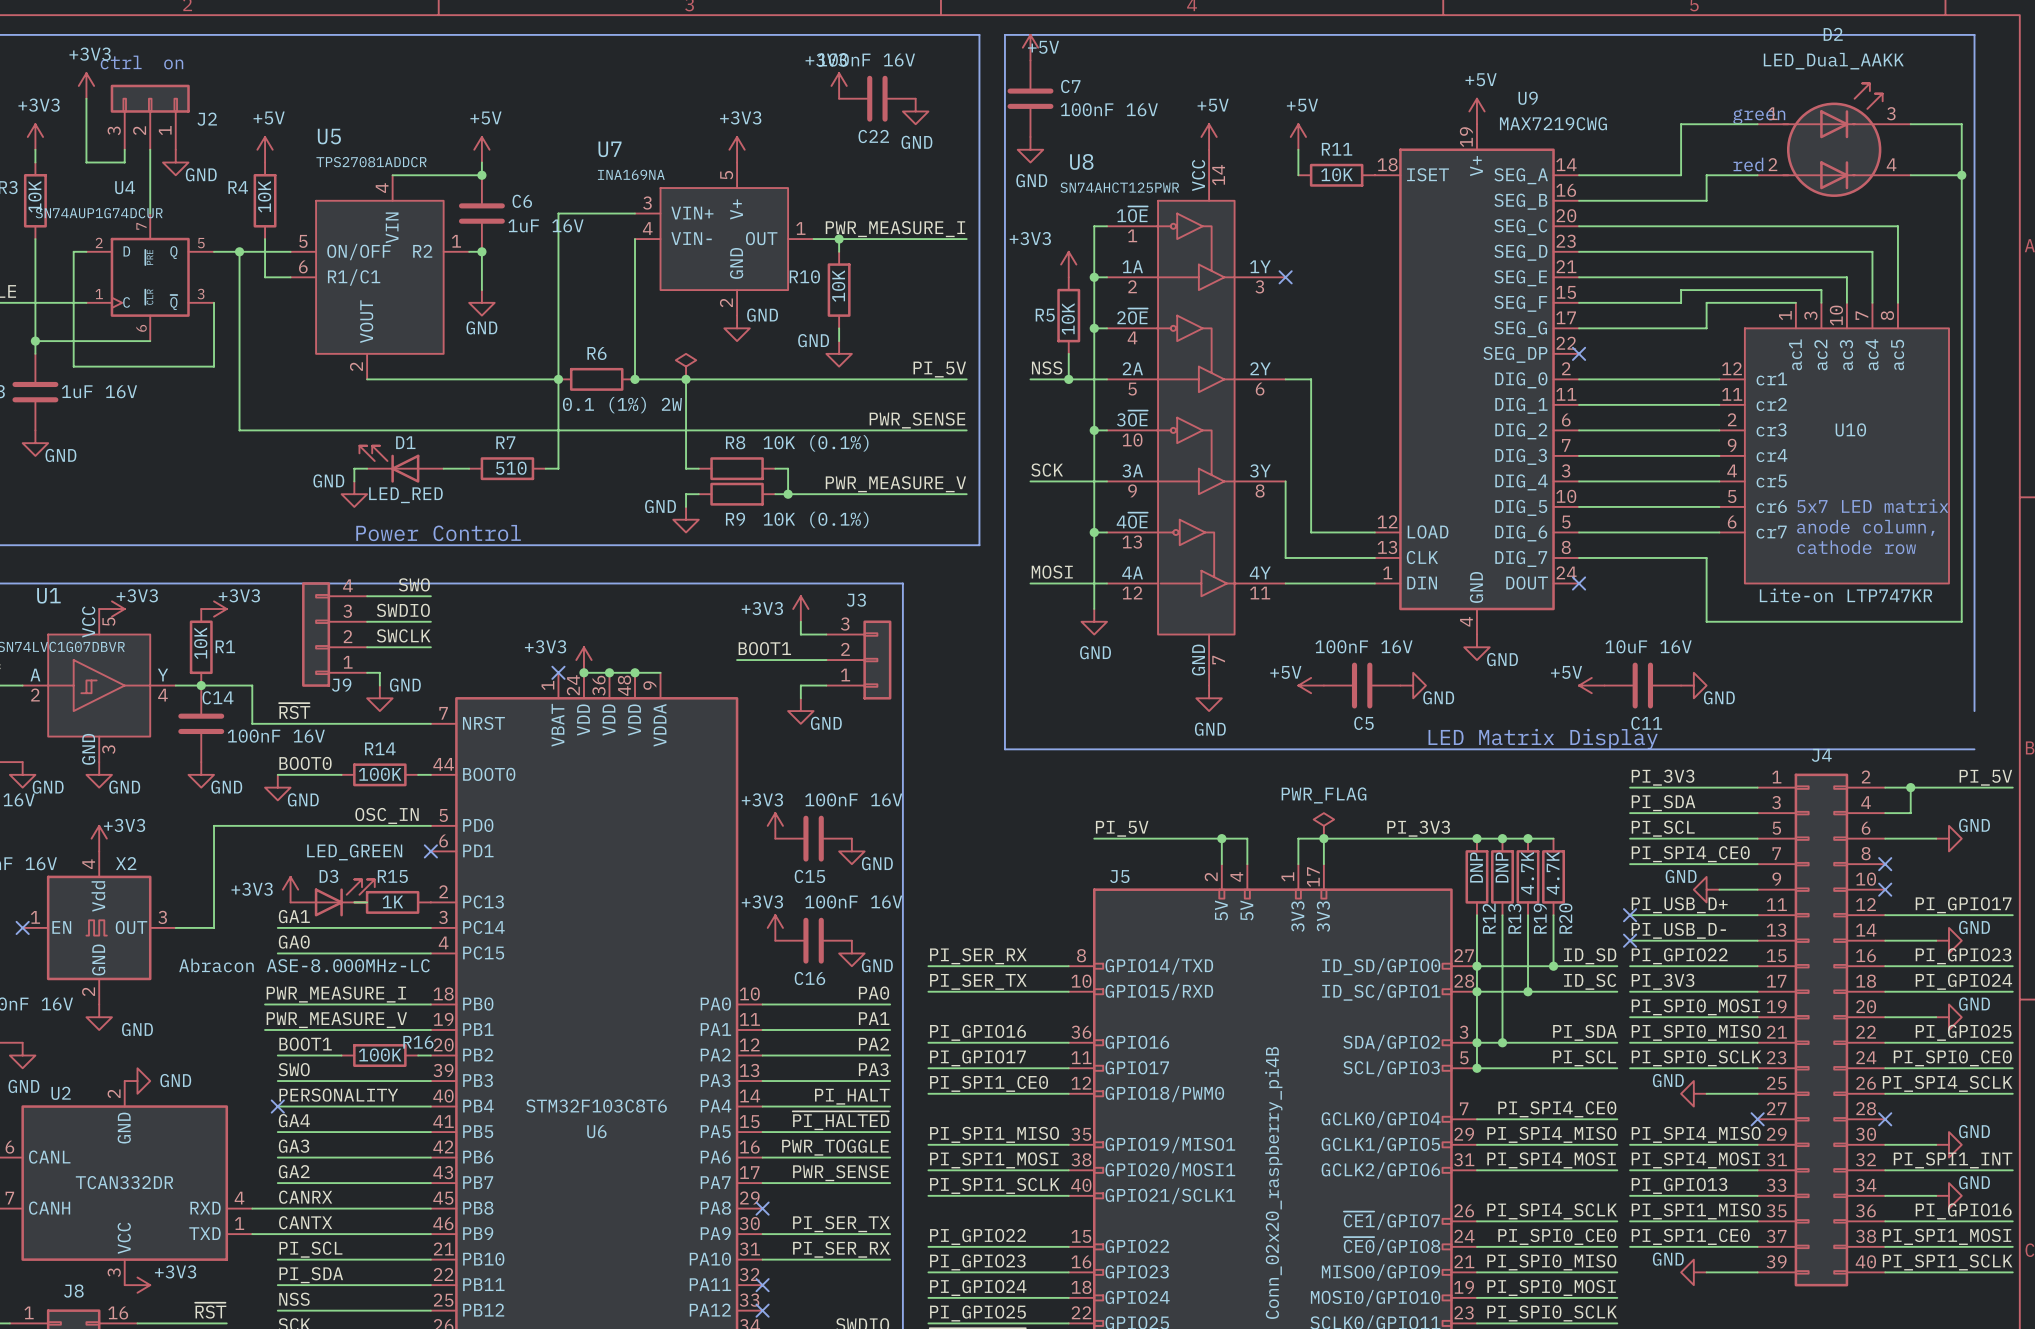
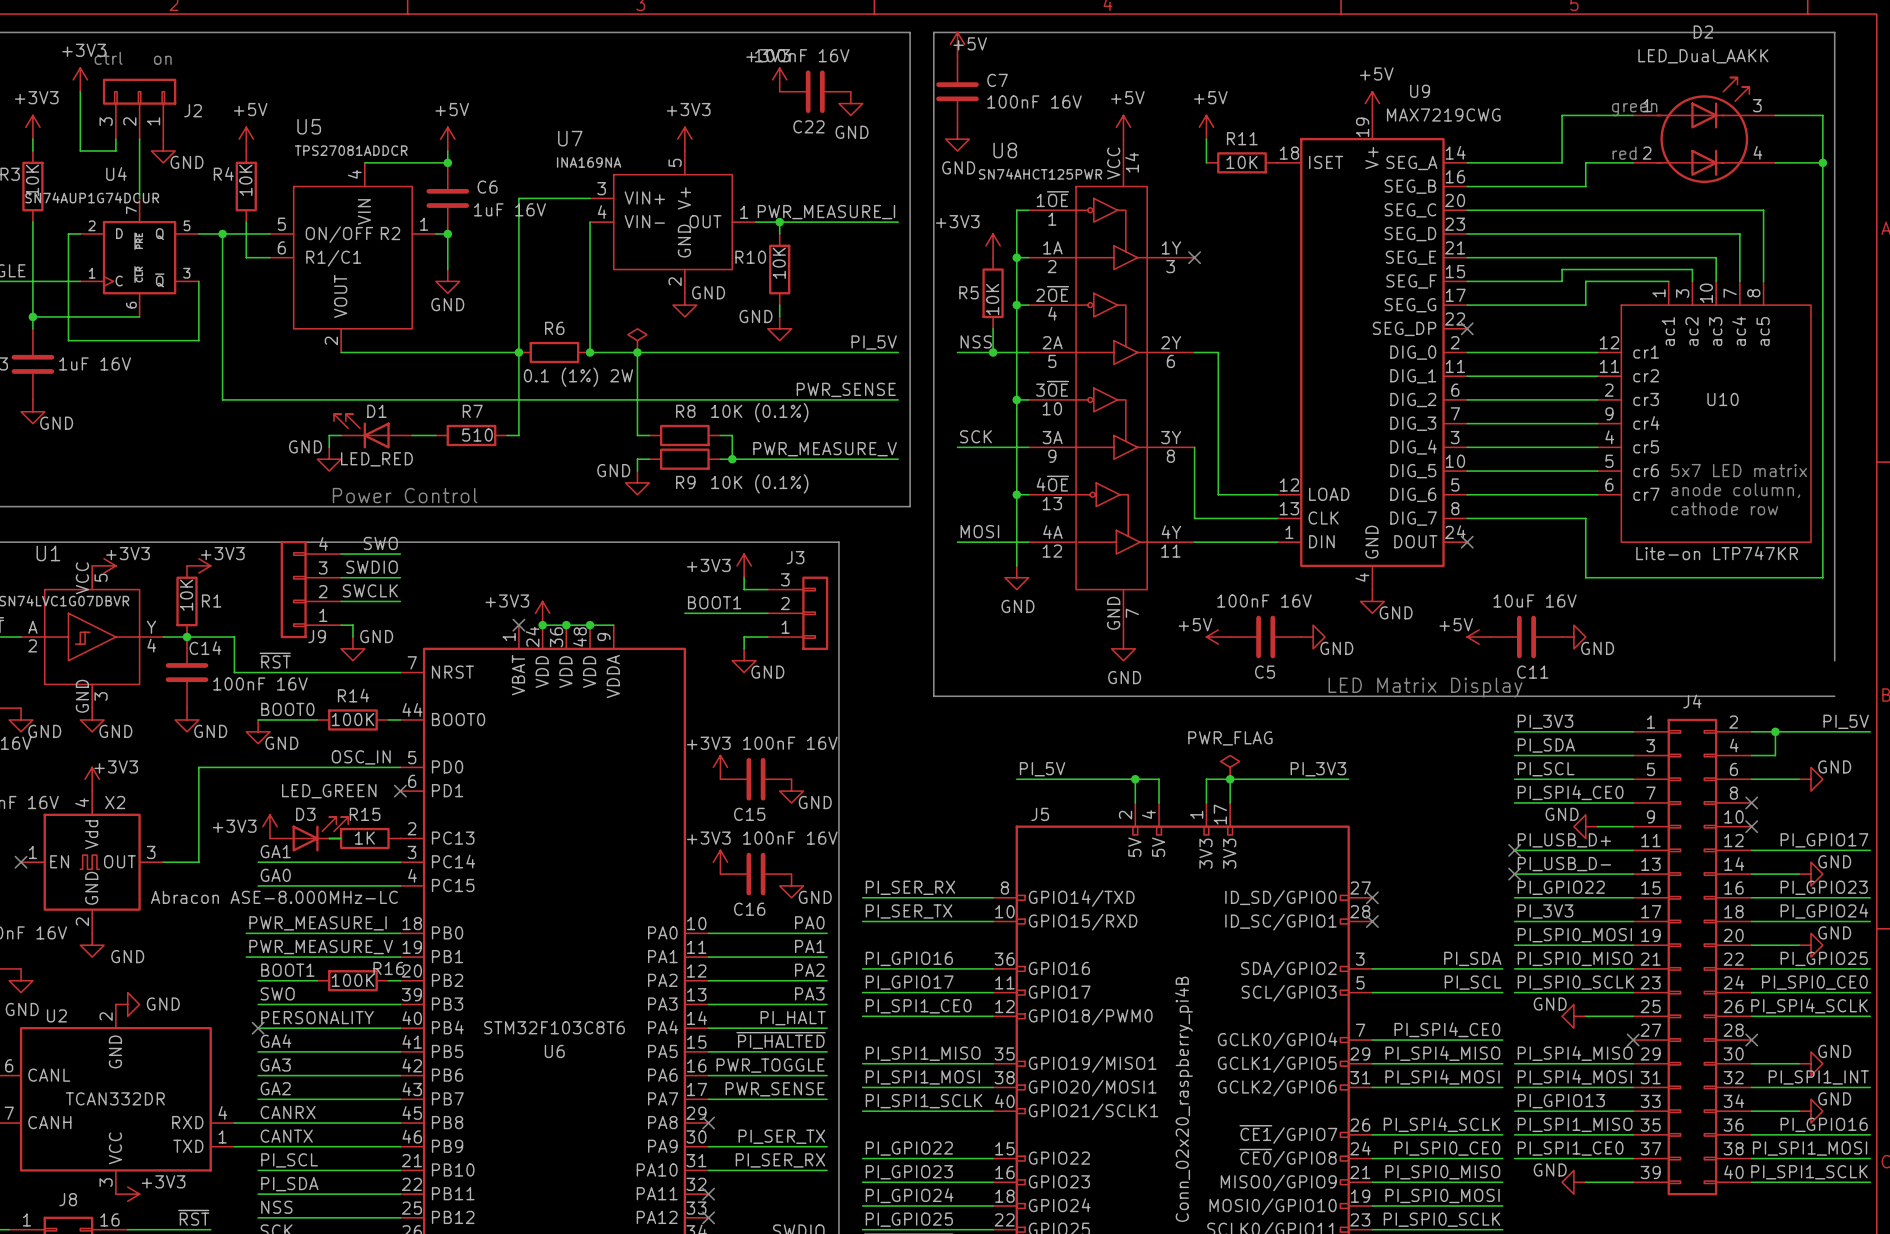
wire: (1451, 838) (1553, 838) -> none
junction: (1476, 838) -> none
junction: (1502, 838) -> none
junction: (1528, 838) -> none
R12: DNP (1476, 876) -> none
R13: DNP (1502, 876) -> none
R19: 4.7K (1528, 876) -> none
R20: 4.7K (1553, 876) -> none
wire: (1476, 915) (1476, 1068) -> none
wire: (1502, 915) (1502, 1042) -> none
wire: (1528, 915) (1528, 991) -> none
wire: (1553, 915) (1553, 966) -> none
label: ID_SD (1590, 956) -> none
wire: (1476, 966) (1617, 966) -> none
junction: (1476, 966) -> none
no-connect mark: none -> (1372, 897)
junction: (1553, 966) -> none
label: ID_SC (1590, 981) -> none
wire: (1476, 991) (1617, 991) -> none
junction: (1476, 991) -> none
no-connect mark: none -> (1372, 921)
junction: (1528, 991) -> none
junction: (1476, 1042) -> none
junction: (1502, 1042) -> none
junction: (1476, 1068) -> none

